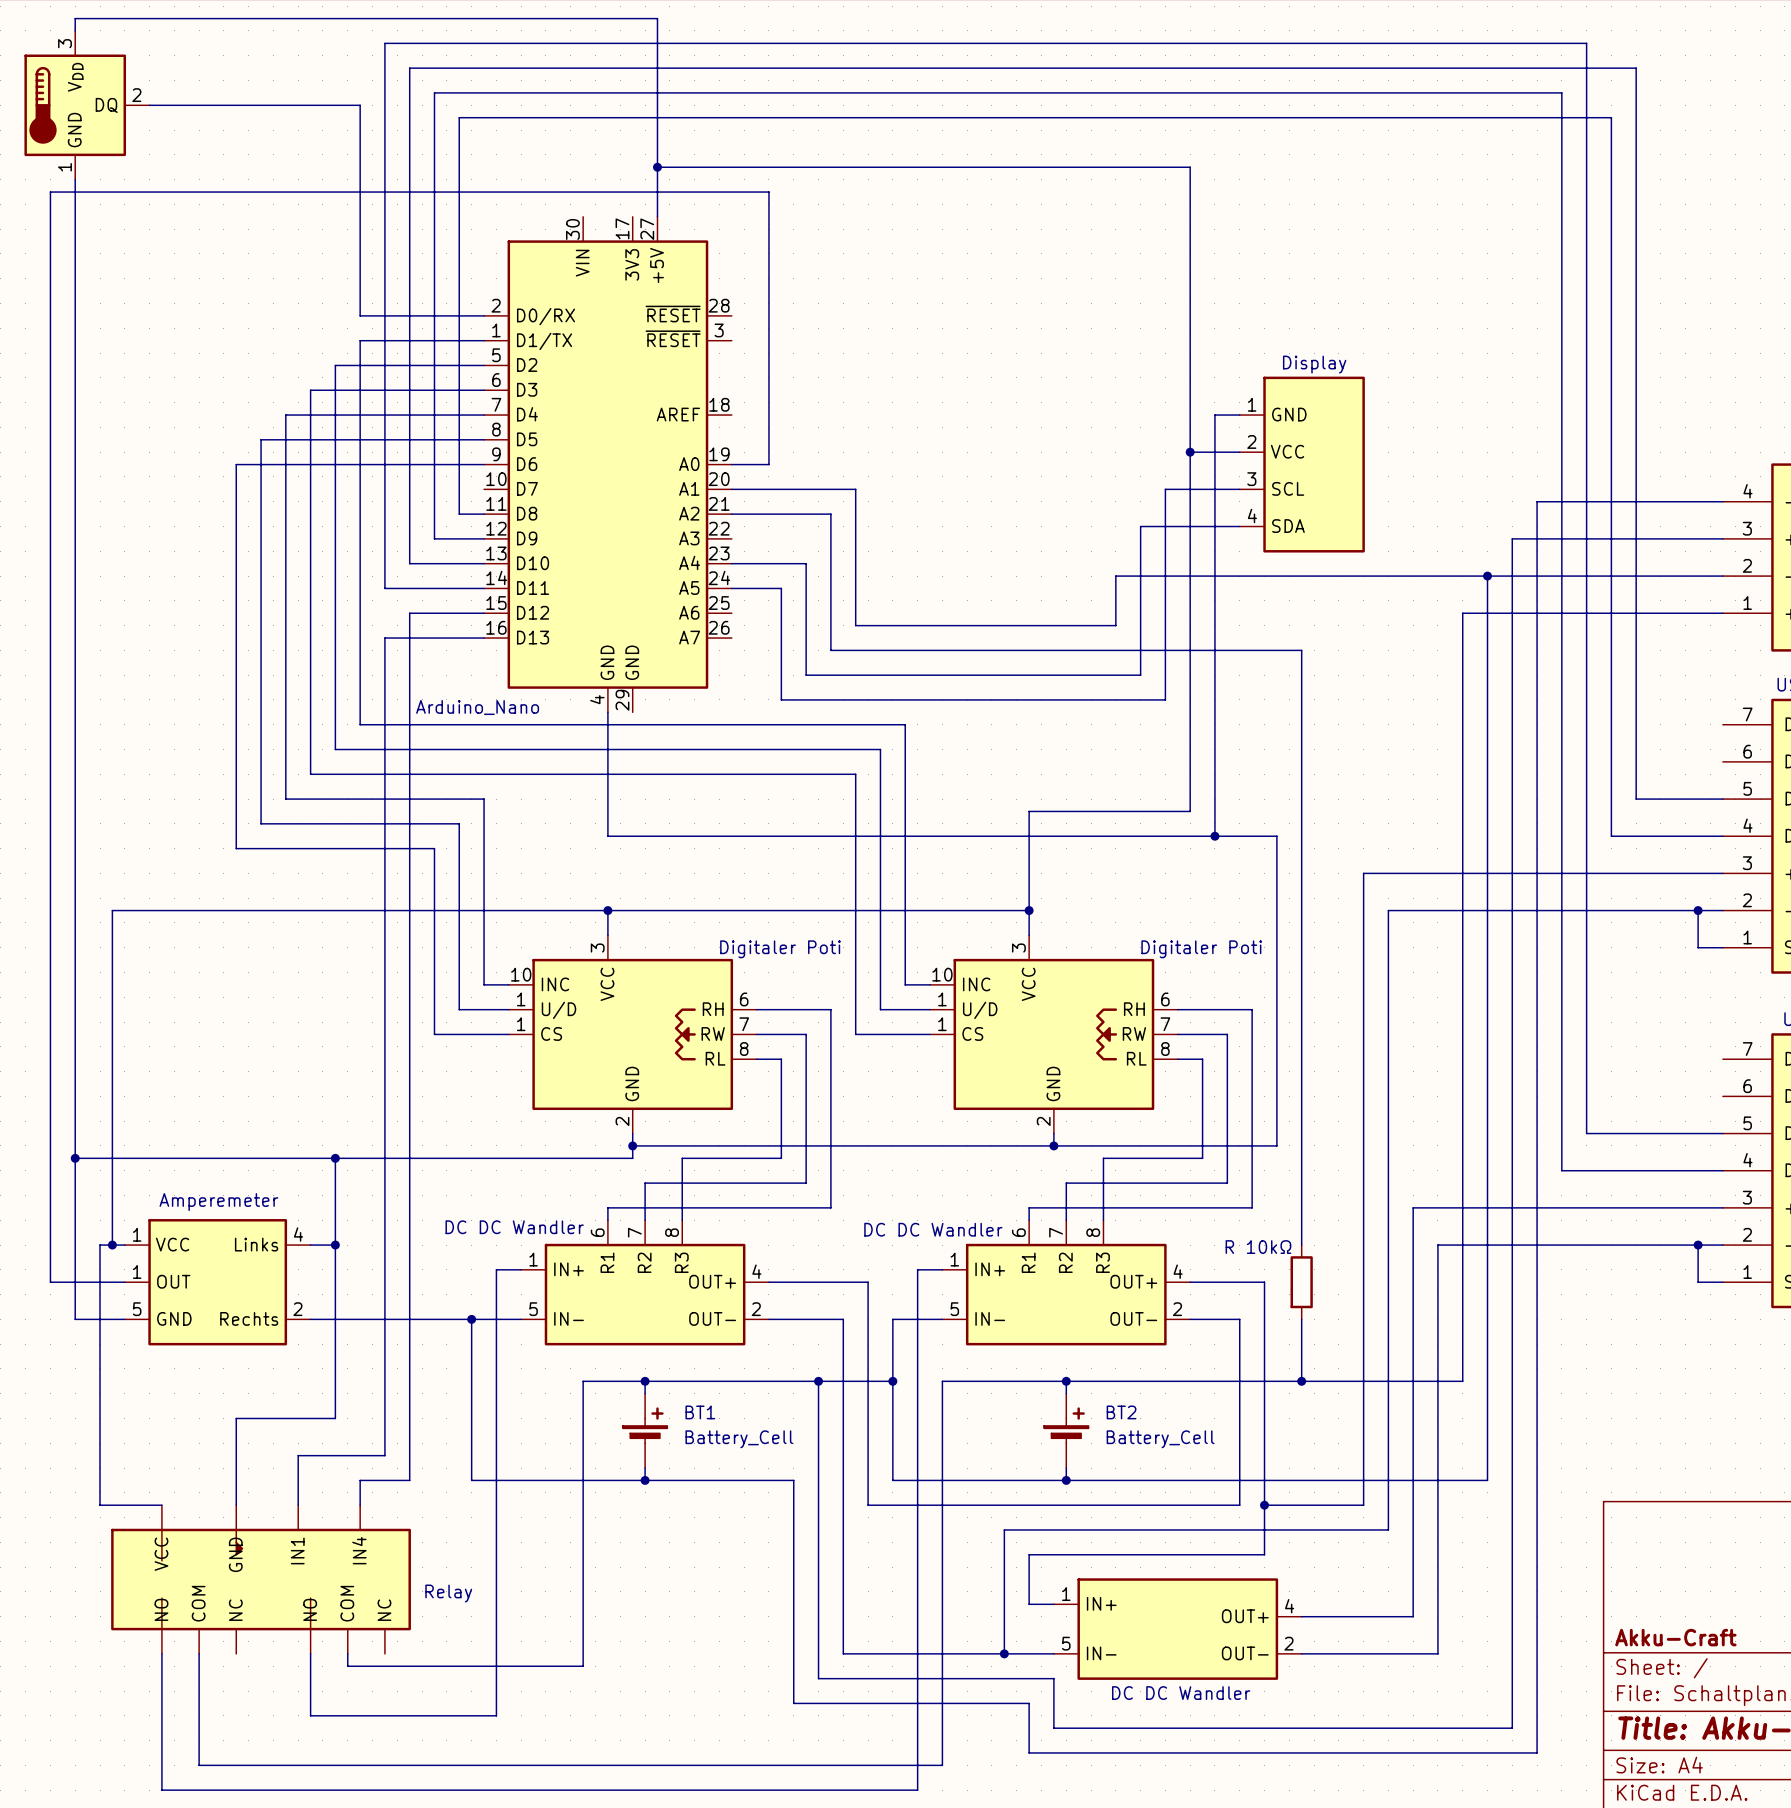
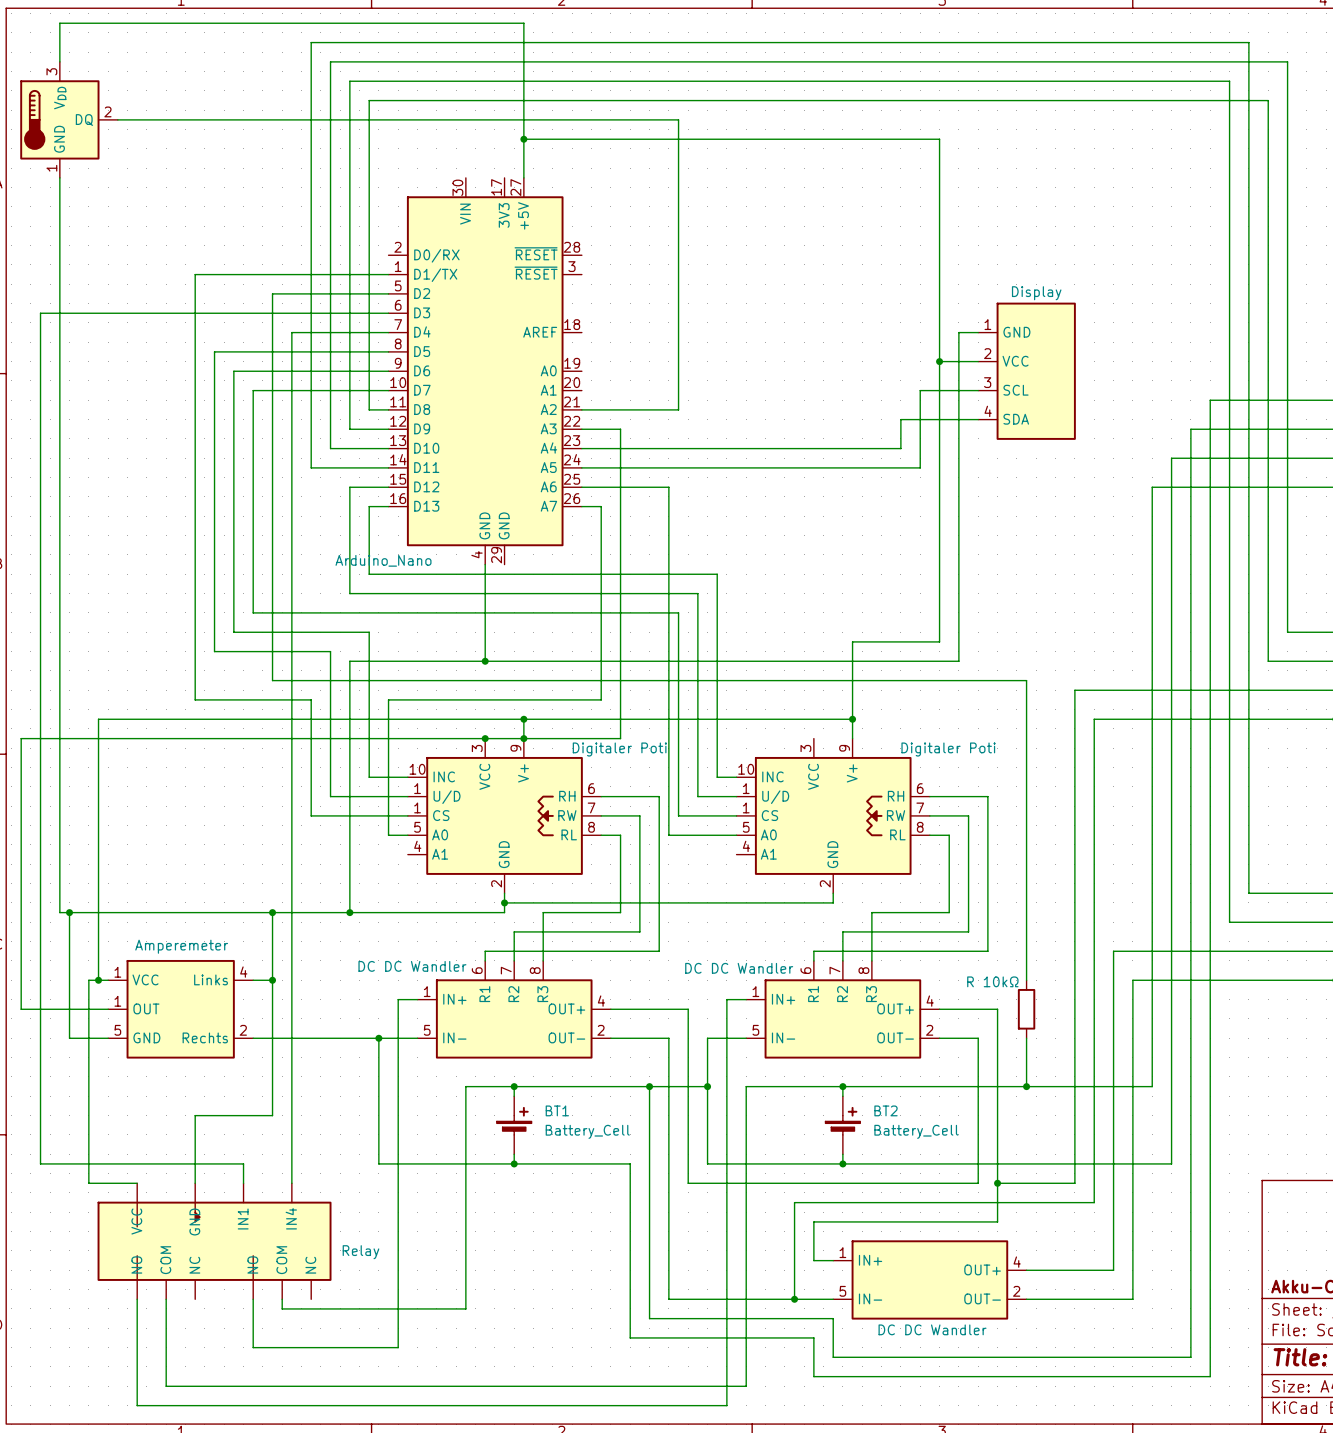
wire: (75, 18) (75, 30) -> (69, 23) (59, 23) (59, 61)
part position: (86, 105) -> (69, 119)
wire: (149, 105) (360, 105) (360, 315) (484, 315) -> none
wire: (75, 179) (75, 1158) -> (59, 177) (59, 912) (69, 912)
wire: (360, 340) (360, 415) (285, 415) (285, 464) (236, 464) -> (291, 274) (195, 274) (195, 371)
wire: (310, 390) (310, 489) -> (388, 390) (253, 390)
wire: none -> (253, 313) (40, 313) (40, 1163) (243, 1163)
wire: (731, 464) (768, 464) (768, 192) (50, 192) (50, 1282) -> (620, 554) (620, 738) (21, 738) (21, 1009) (50, 1009)
wire: (731, 489) (855, 489) -> (117, 119) (678, 119) (678, 390)
wire: (830, 514) (830, 650) (1301, 650) (1301, 861) -> (272, 593) (272, 680) (1026, 680)
wire: (855, 514) (855, 625) (1115, 625) (1115, 576) (1487, 576) -> (678, 409) (659, 409)
wire: (806, 563) (806, 675) (1140, 675) (1140, 563) -> (639, 448) (900, 448)
junction: (1487, 576) -> none
wire: (1165, 588) (1165, 699) (781, 699) -> (920, 467) (620, 467) (620, 429) (581, 429)
wire: (434, 613) (409, 613) (409, 823) (459, 823) -> (349, 487) (349, 593)
wire: none -> (581, 487) (668, 487) (668, 835) (736, 835)
wire: (459, 638) (384, 638) (384, 885) -> none
wire: none -> (581, 506) (601, 506) (601, 699) (388, 699)
wire: (360, 724) (459, 724) -> (369, 506) (369, 574)
wire: (335, 749) (434, 749) -> none
wire: (459, 799) (484, 799) (484, 885) -> (369, 632) (369, 651)
wire: (1078, 811) (1029, 811) (1029, 935) -> (852, 641) (852, 738)
wire: none -> (485, 661) (349, 661) (349, 670)
junction: none -> (485, 661)
wire: (1214, 836) (1276, 836) (1276, 1145) (1053, 1145) -> none
junction: (1214, 836) -> none
wire: (236, 848) (434, 848) -> (195, 670) (195, 699) (311, 699)
wire: (607, 910) (607, 935) -> (523, 719) (523, 738)
junction: (607, 910) -> none
junction: none -> (523, 719)
wire: none -> (813, 719) (852, 719)
junction position: (1029, 910) -> (852, 719)
part symbol: [508, 935, 757, 1134] -> [407, 738, 602, 894]
junction: none -> (485, 738)
junction: none -> (523, 738)
part symbol: [930, 935, 1178, 1134] -> [736, 738, 930, 894]
wire: (459, 984) (459, 1009) -> (330, 796) (369, 796)
wire: none -> (369, 777) (388, 777) (388, 835) (407, 835)
wire: (409, 1009) (409, 1480) (360, 1480) -> (291, 574) (291, 1163)
wire: (384, 1034) (384, 1455) (298, 1455) (298, 1480) -> (311, 815) (349, 815) (349, 912)
junction: (1053, 1145) -> none
junction: none -> (349, 912)

